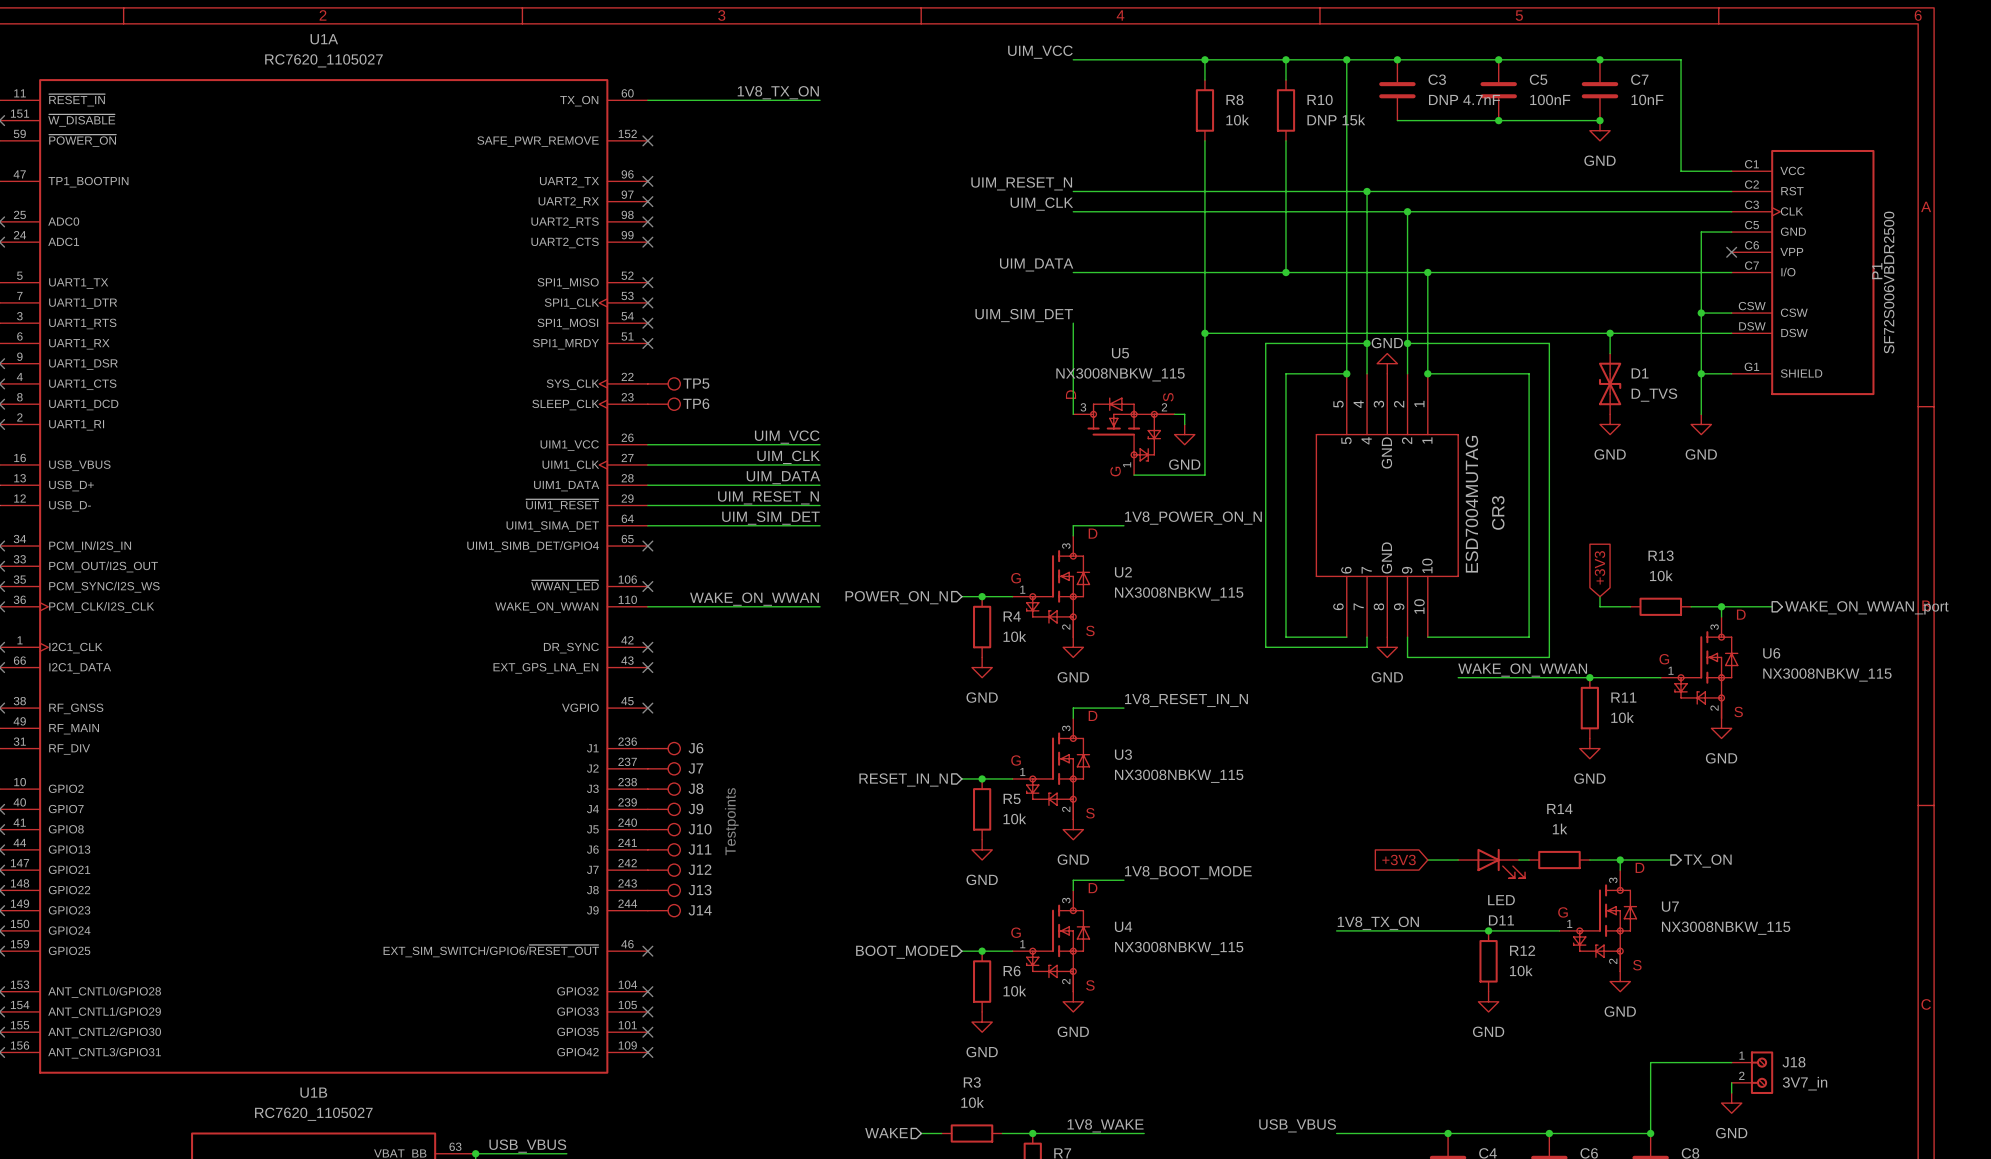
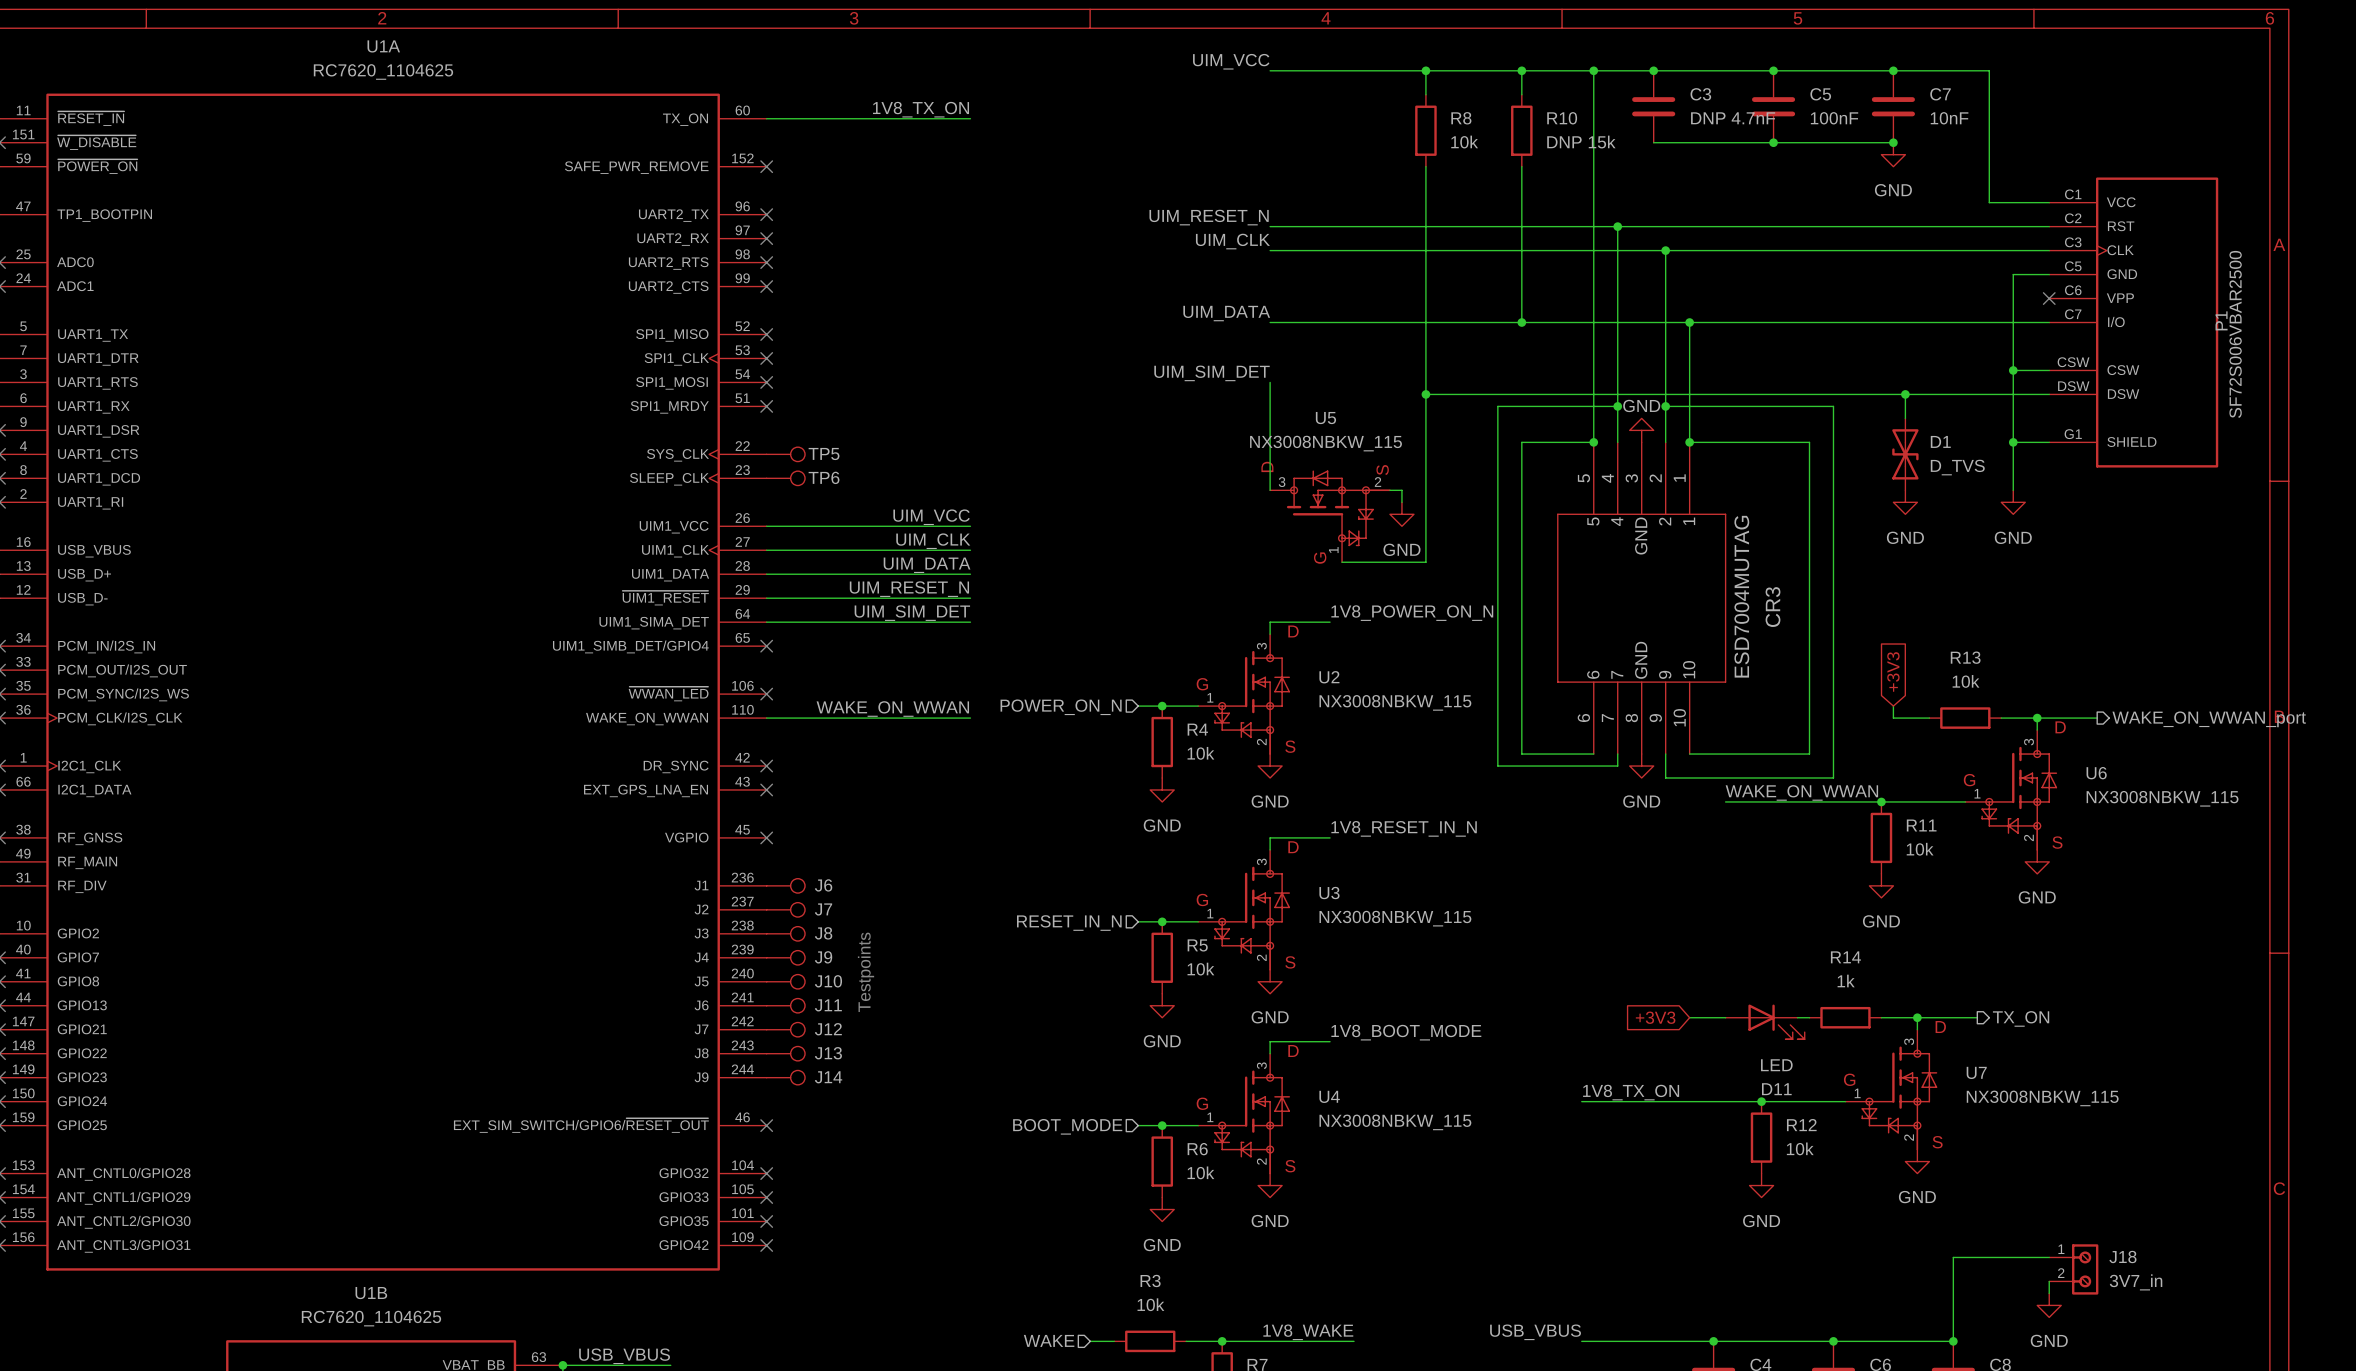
U1A value: RC7620_1105027 (323, 60) -> RC7620_1104625 (383, 71)
P1 value: SF72S006VBDR2500 (1889, 282) -> SF72S006VBAR2500 (2235, 334)
U1B value: RC7620_1105027 (313, 1114) -> RC7620_1104625 (371, 1318)

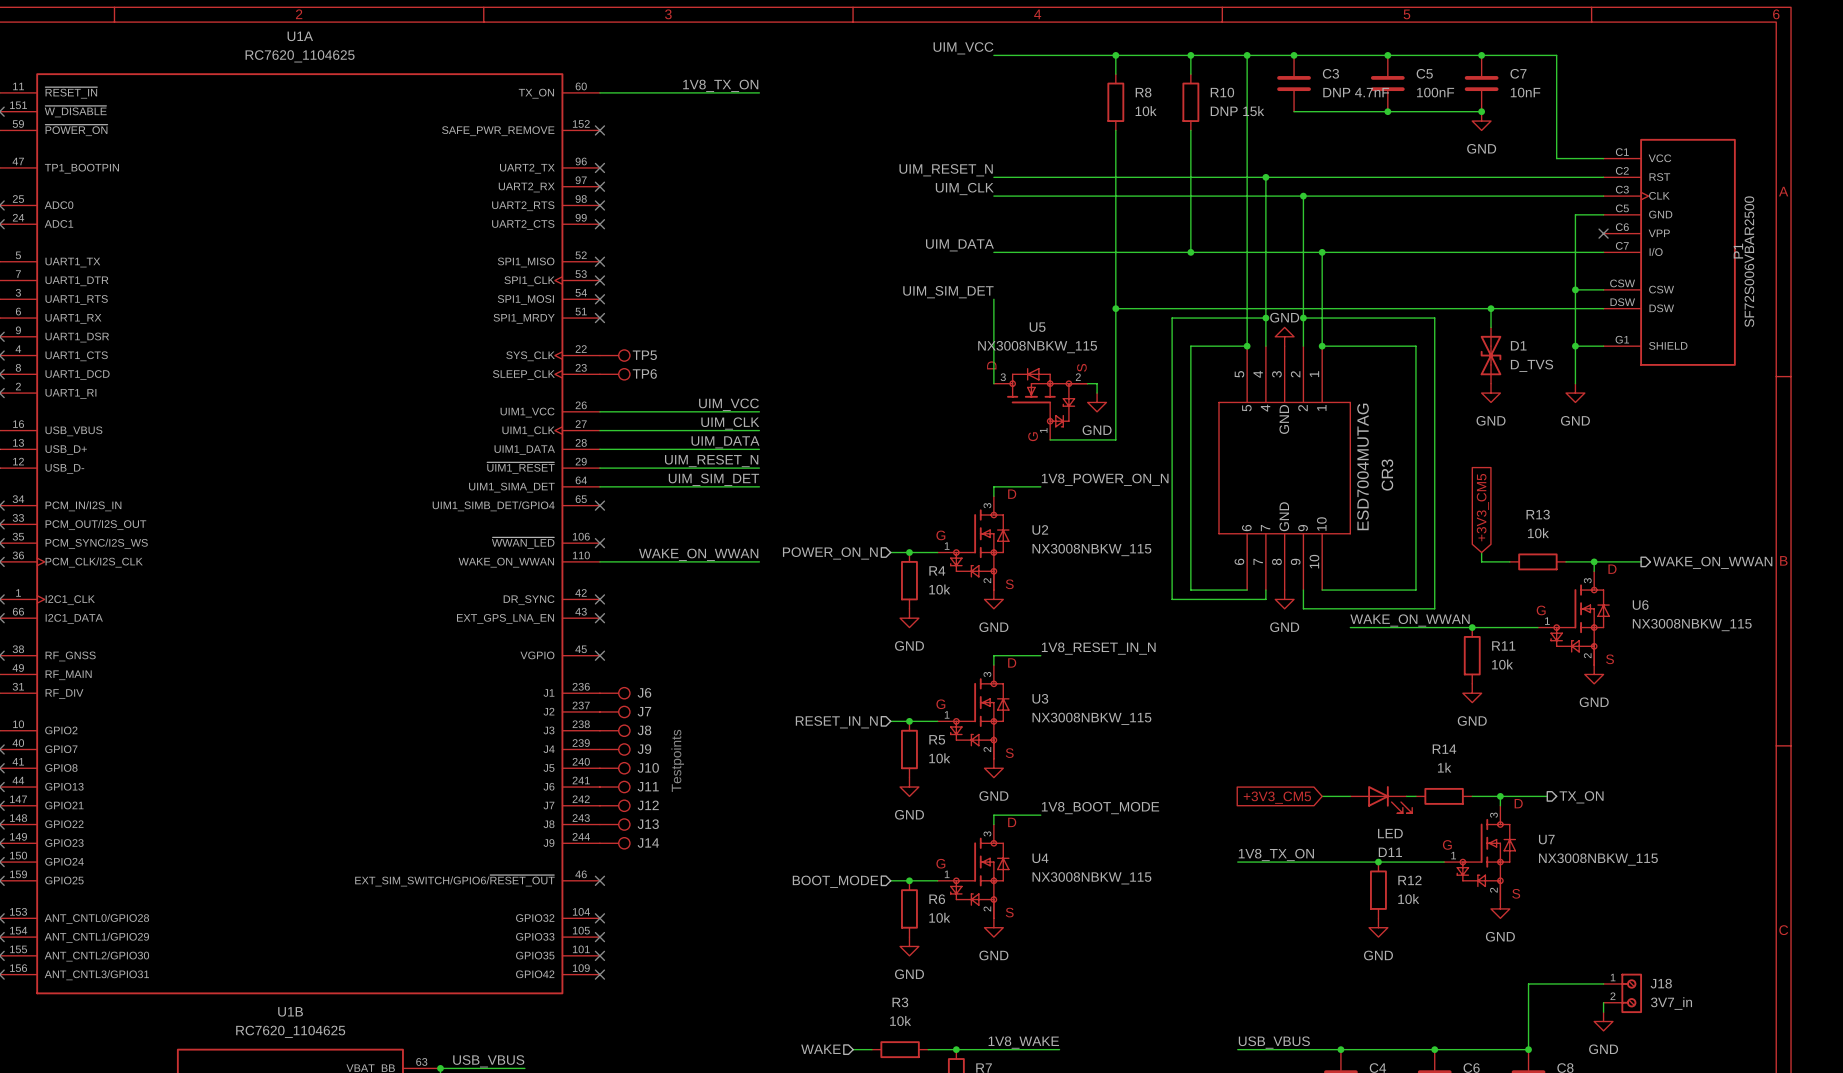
global label: +3V3 (1893, 671) -> +3V3_CM5 (1482, 507)
hierarchical label: WAKE_ON_WWAN_port (2209, 719) -> WAKE_ON_WWAN (1712, 562)
global label: +3V3 (1655, 1017) -> +3V3_CM5 (1277, 797)
label position: USB_VBUS (1535, 1332) -> USB_VBUS (1274, 1042)

